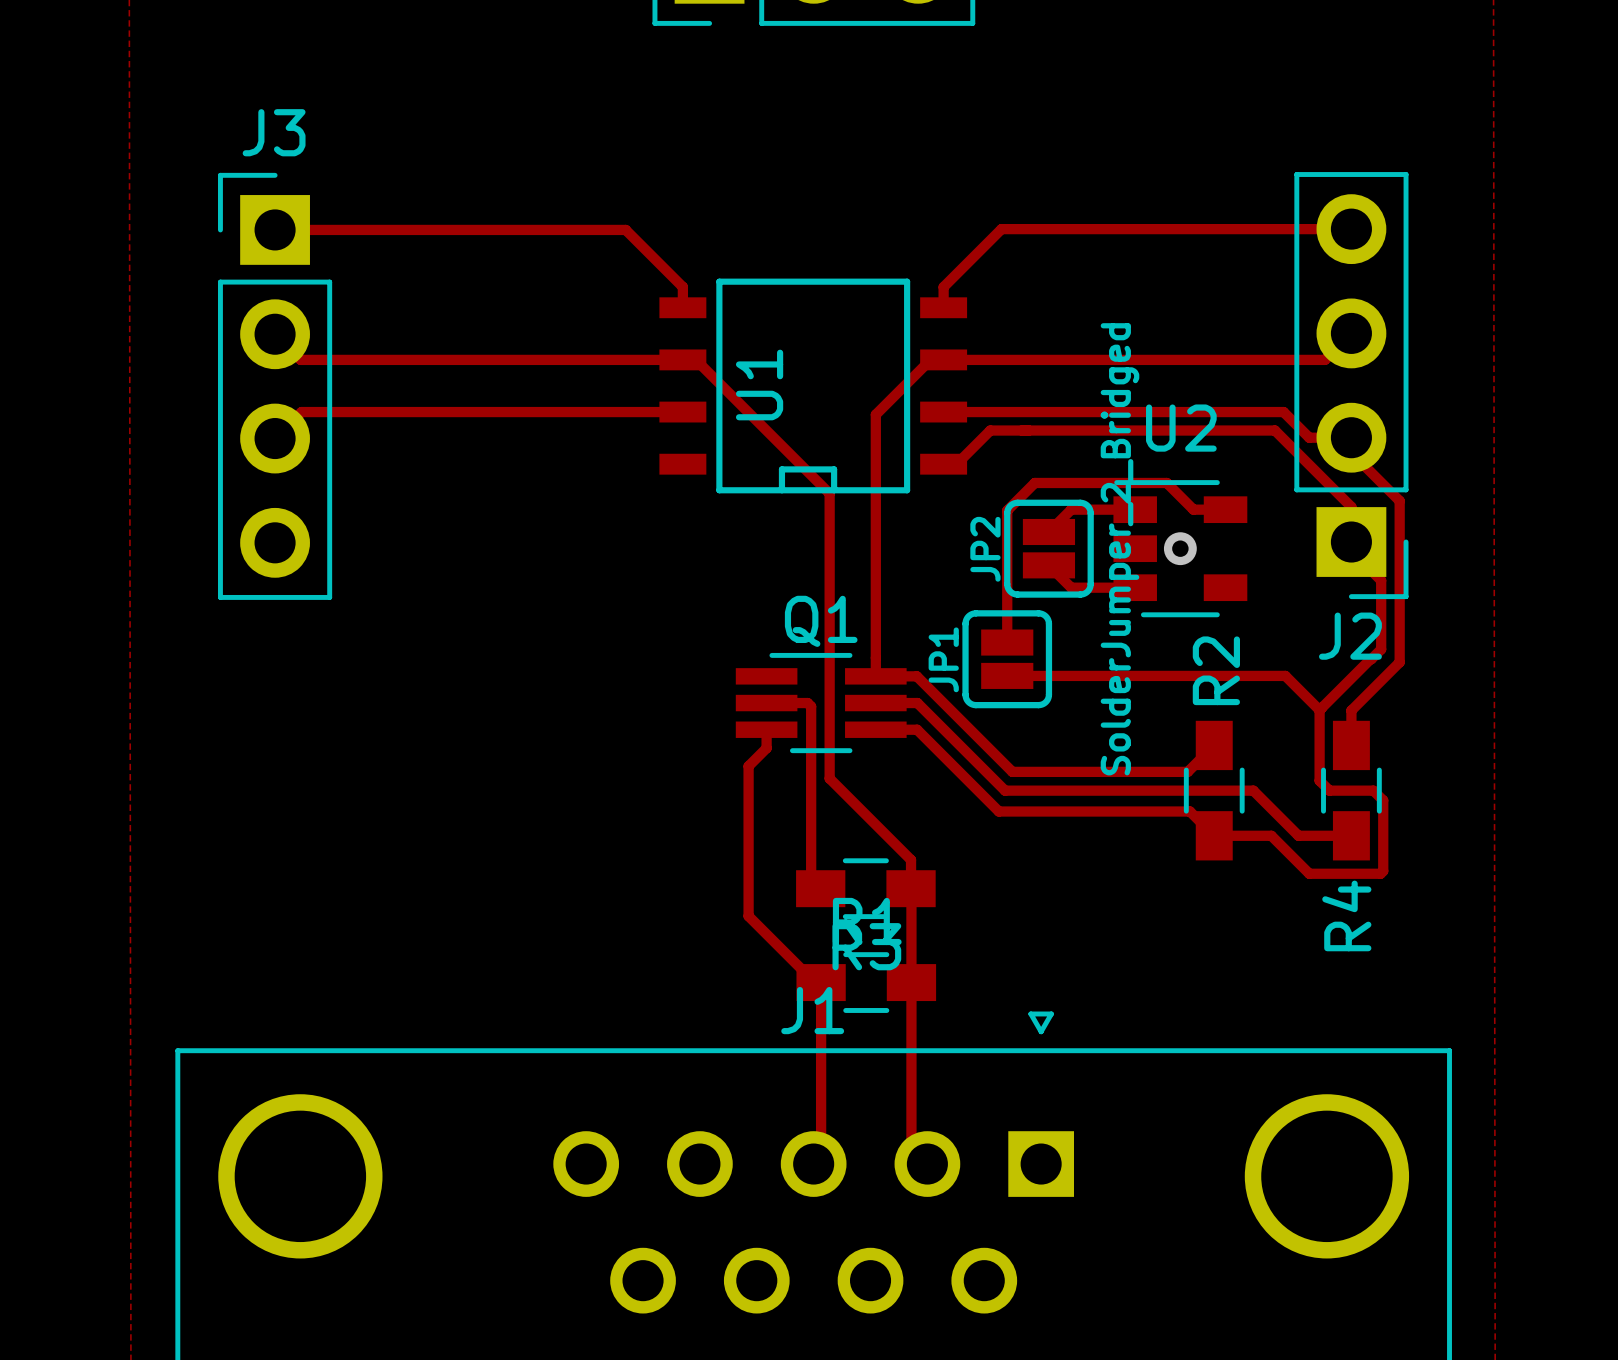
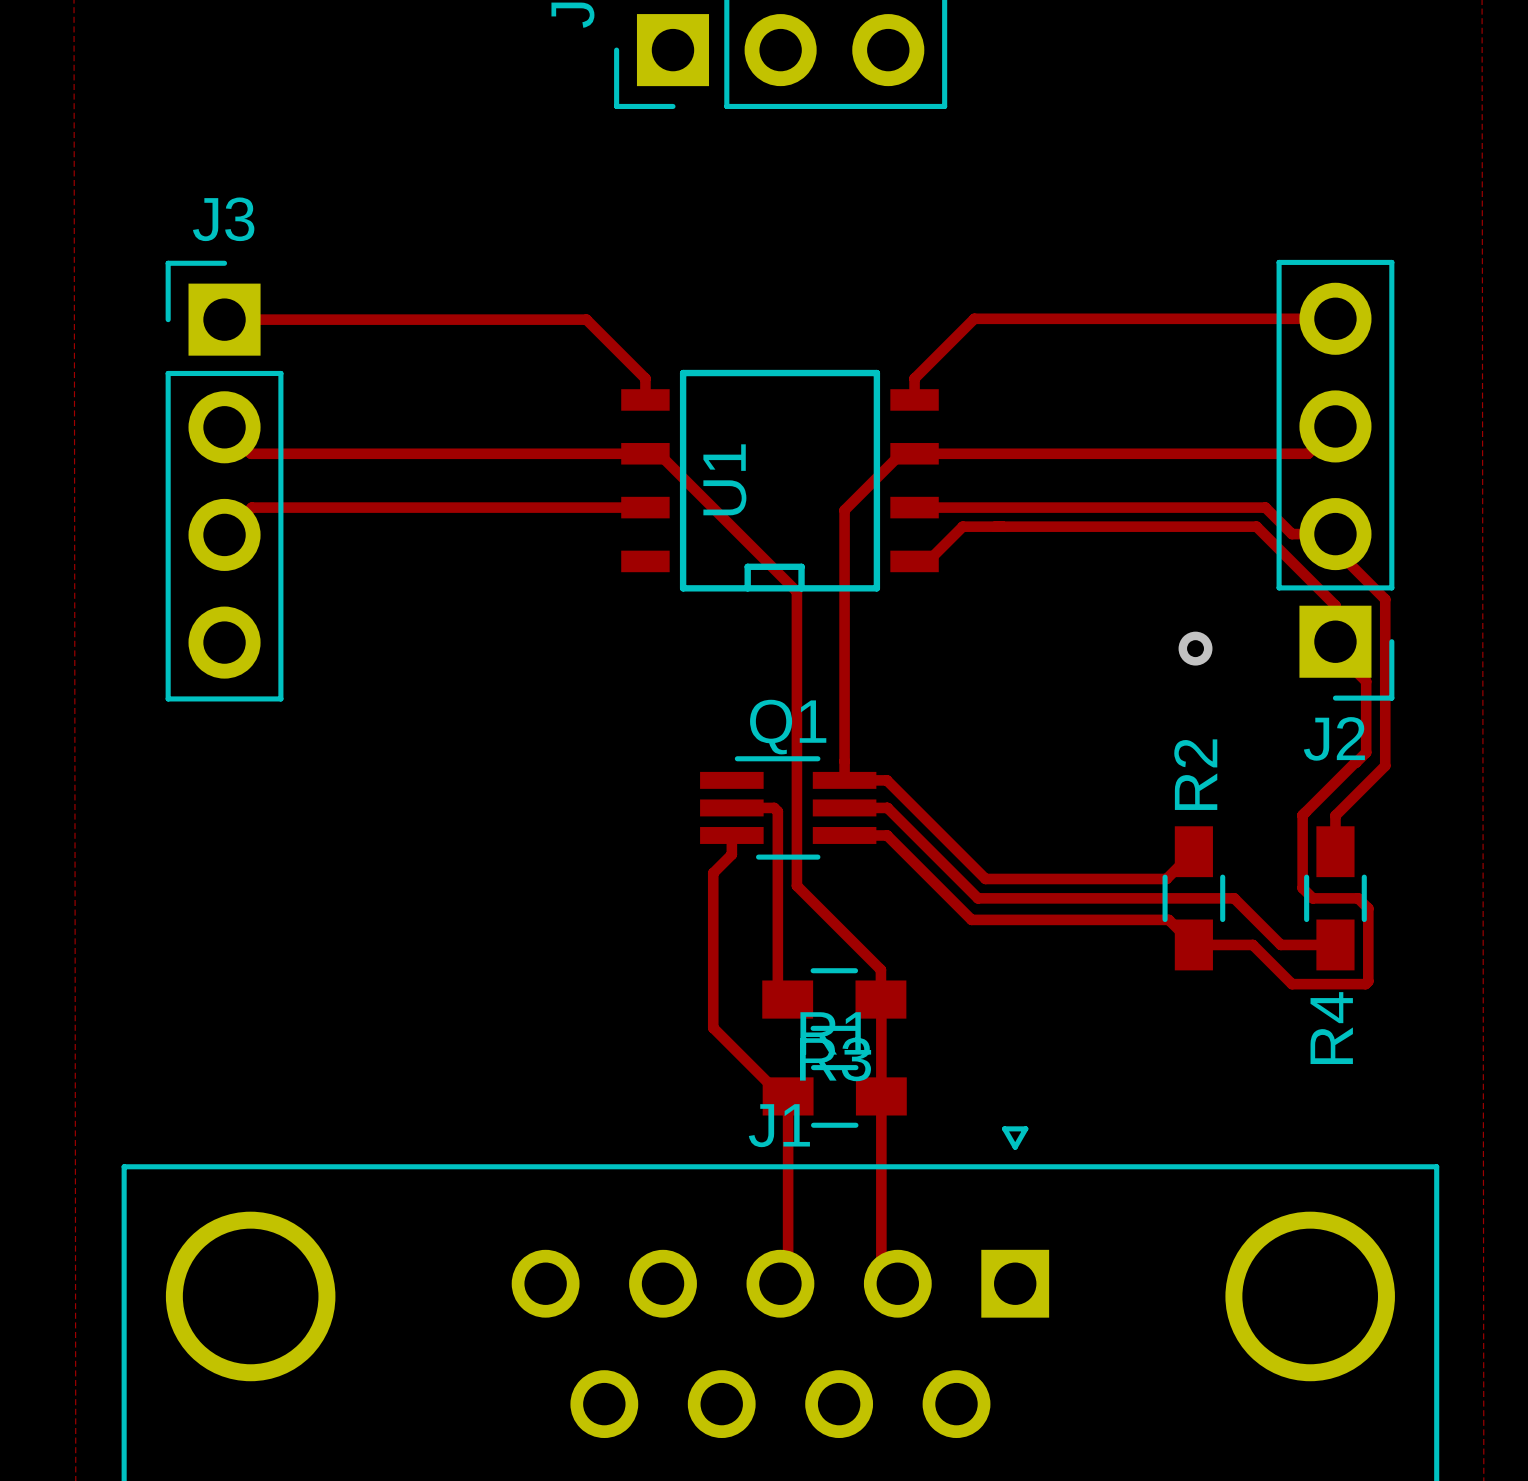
track: (1135, 509) (1071, 509) (1048, 531) -> none
track: (1225, 509) (1193, 509) (1166, 482) (1034, 482) (1007, 510) (1007, 642) -> none
JP2: SolderJumper_2_Bridged (1048, 548) -> none
U2: (1180, 548) -> none
via position: (1180, 548) -> (1195, 648)
track: (1048, 565) (1071, 587) (1135, 587) -> none
JP1: (1007, 659) -> none
track: (1007, 675) (1285, 675) (1319, 710) -> none

